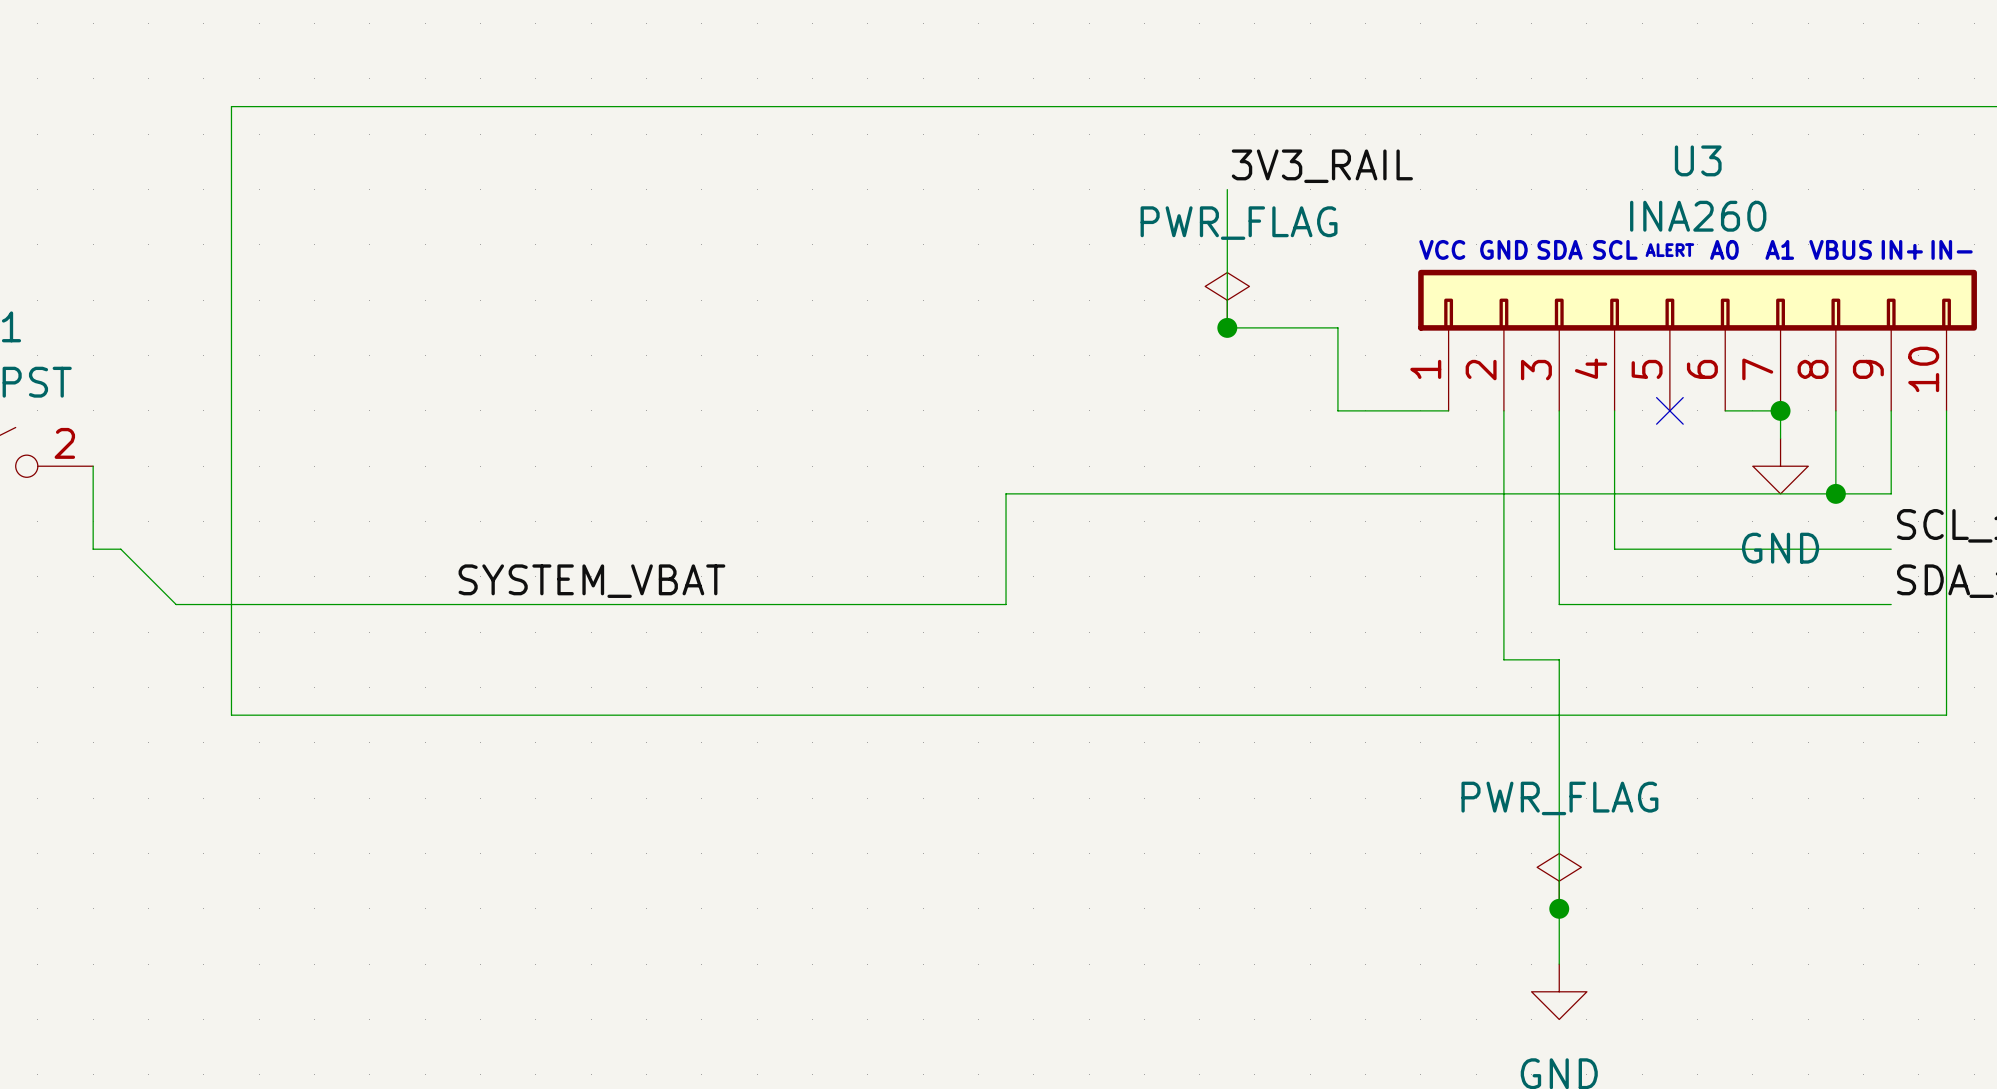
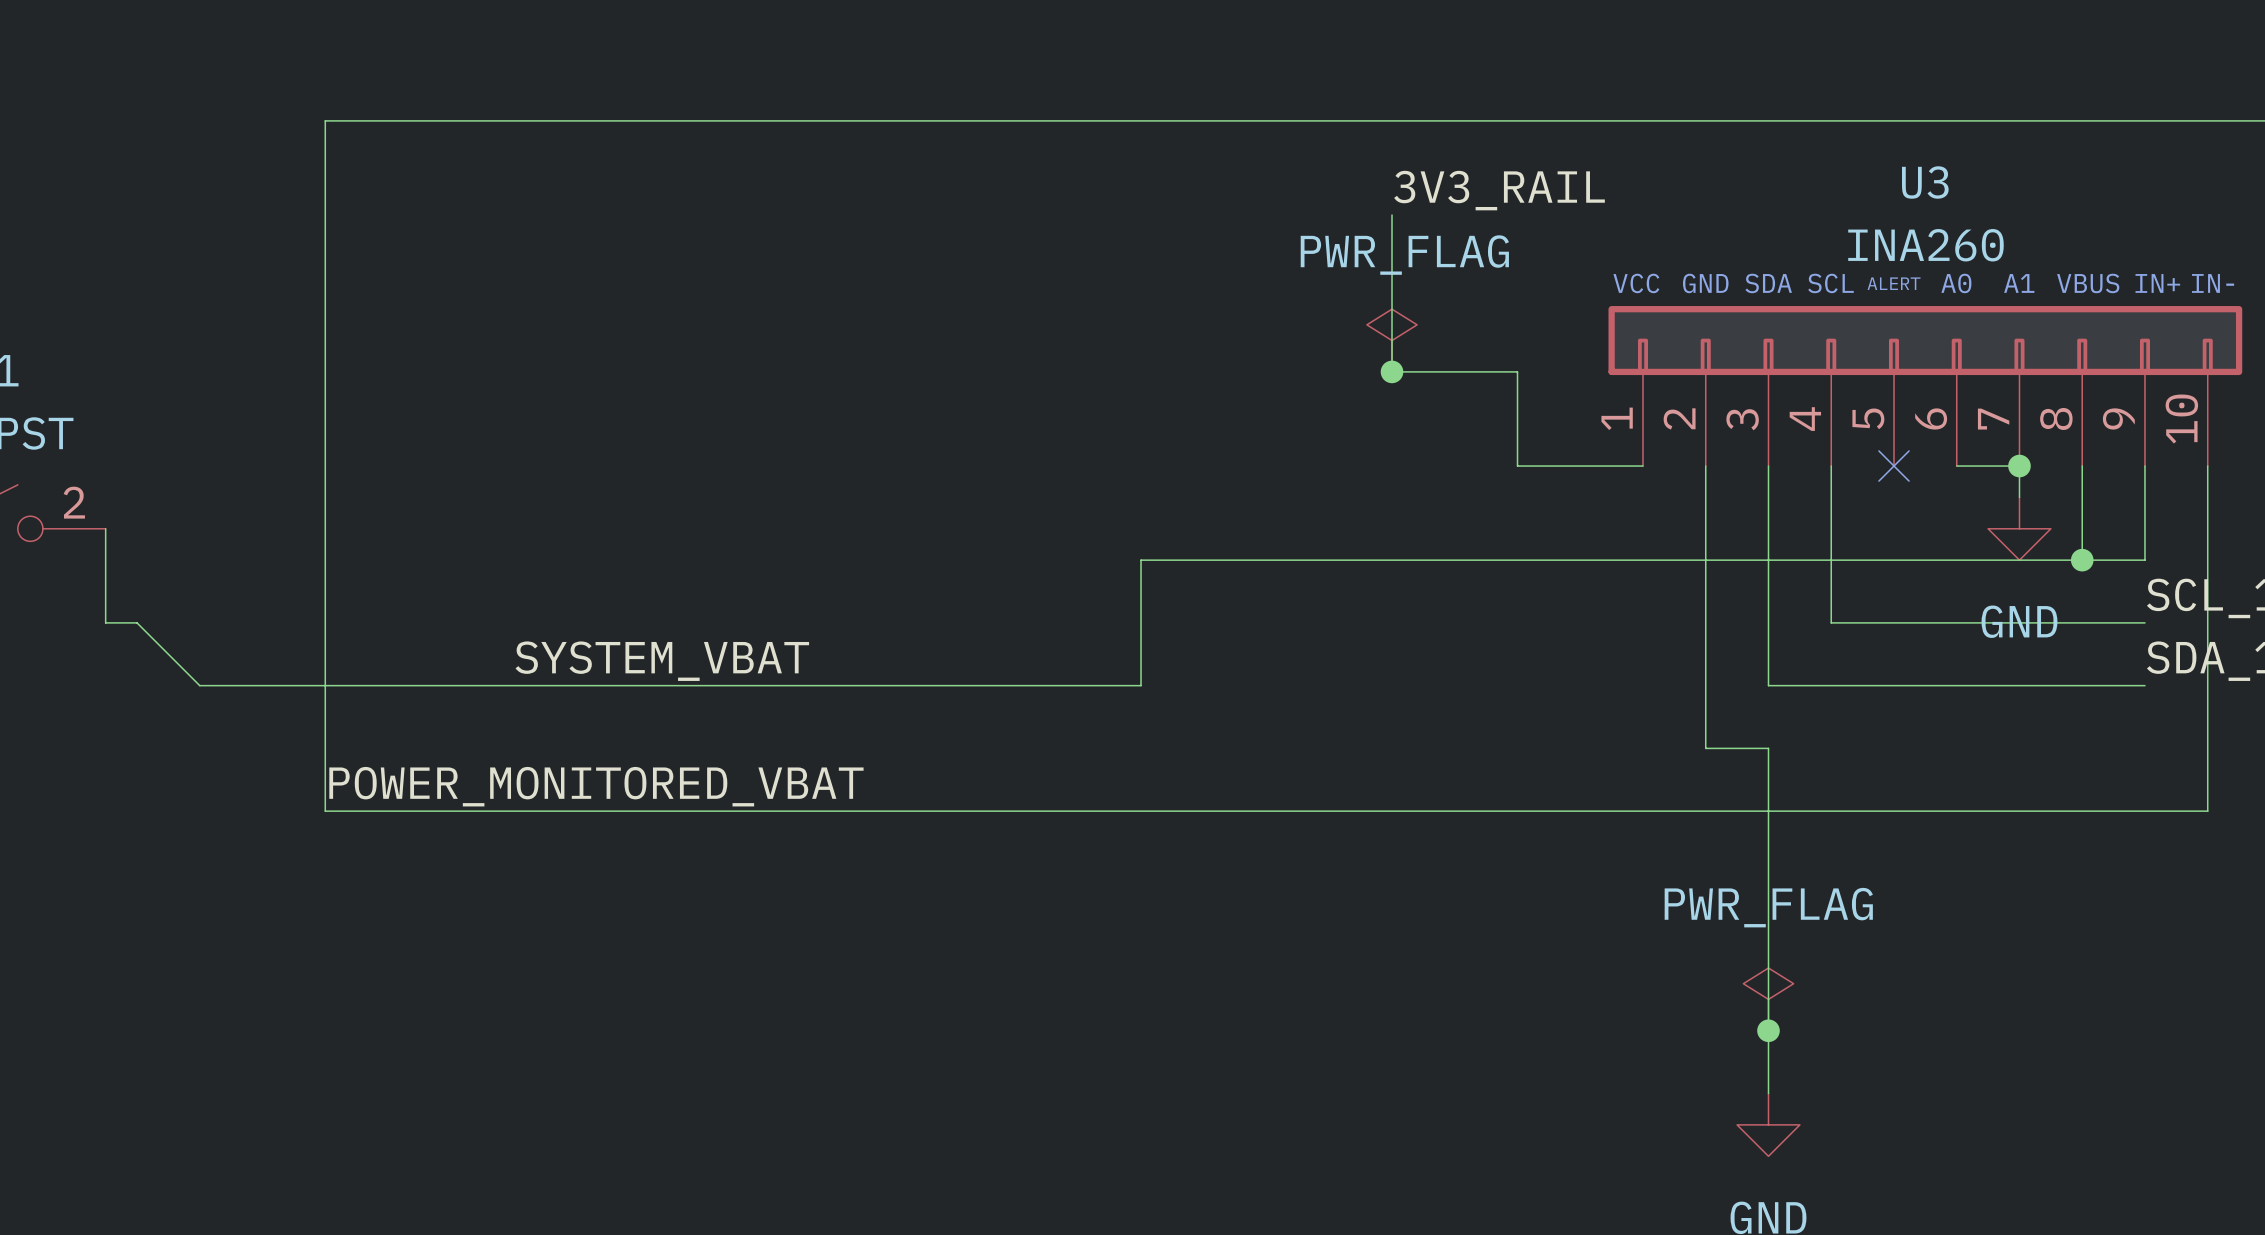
wire: (286, 106) (231, 106) (231, 715) (286, 715) -> (325, 120) (325, 811)
label: none -> POWER_MONITORED_VBAT (596, 786)

